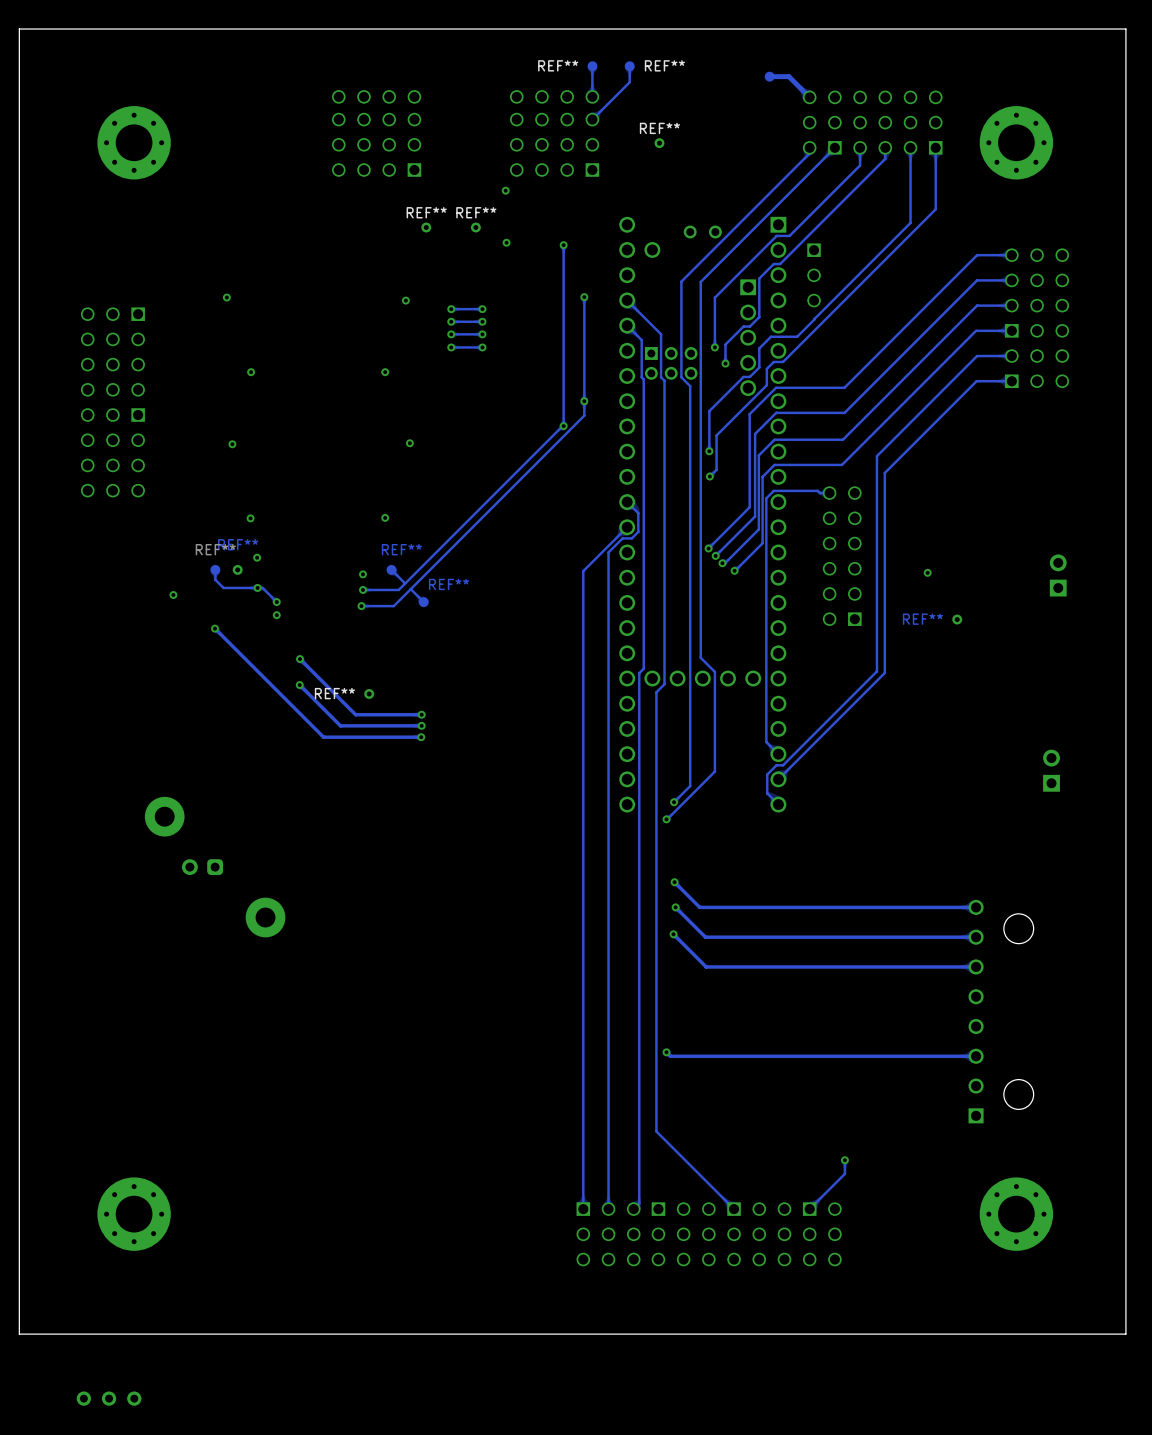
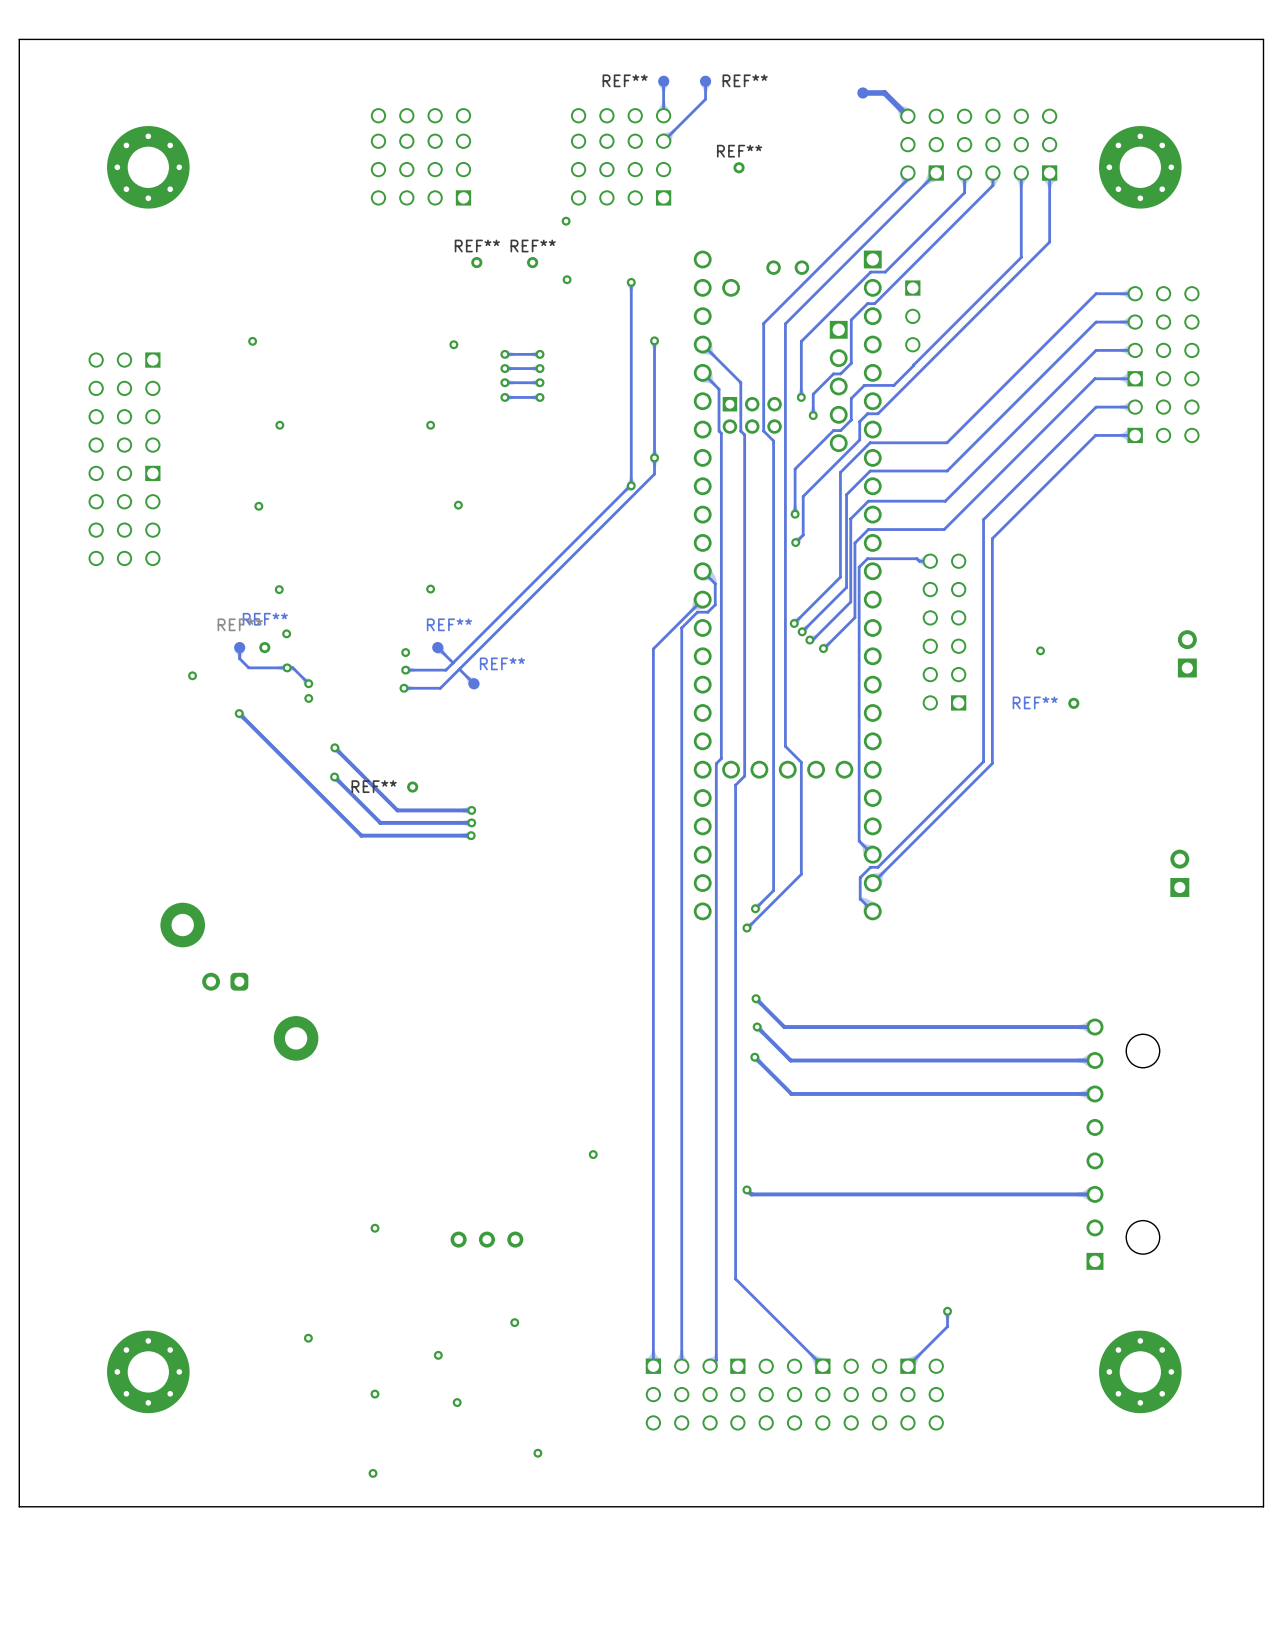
via: none -> (593, 1154)
via: none -> (375, 1228)
part: none -> (486, 1239)
via: none -> (514, 1322)
via: none -> (308, 1338)
via: none -> (438, 1355)
via: none -> (374, 1394)
via: none -> (457, 1402)
via: none -> (537, 1453)
via: none -> (373, 1473)
part: (109, 1398) -> none

